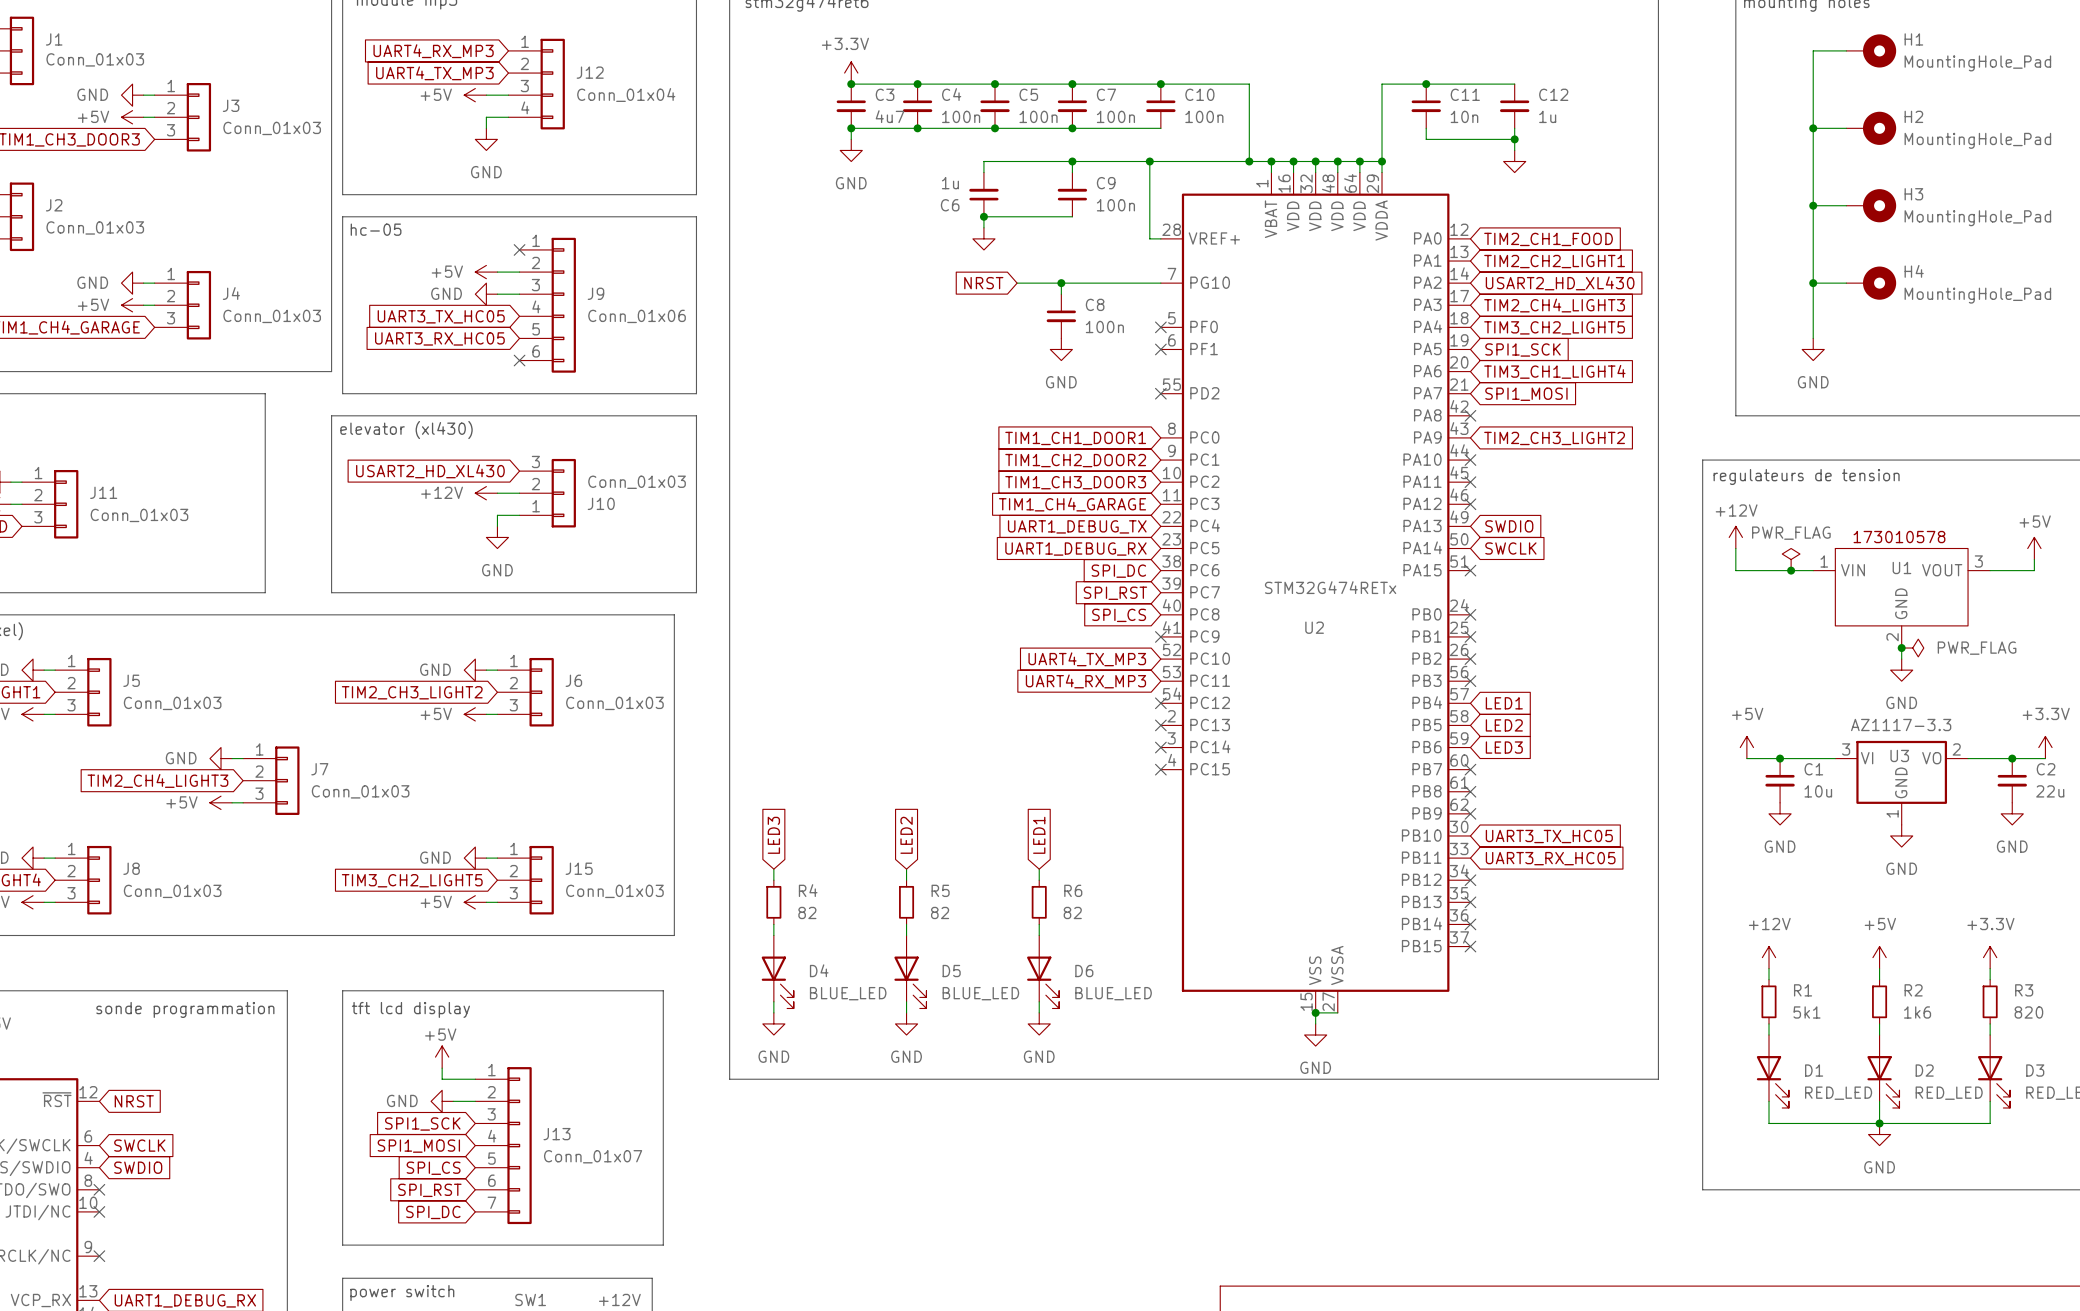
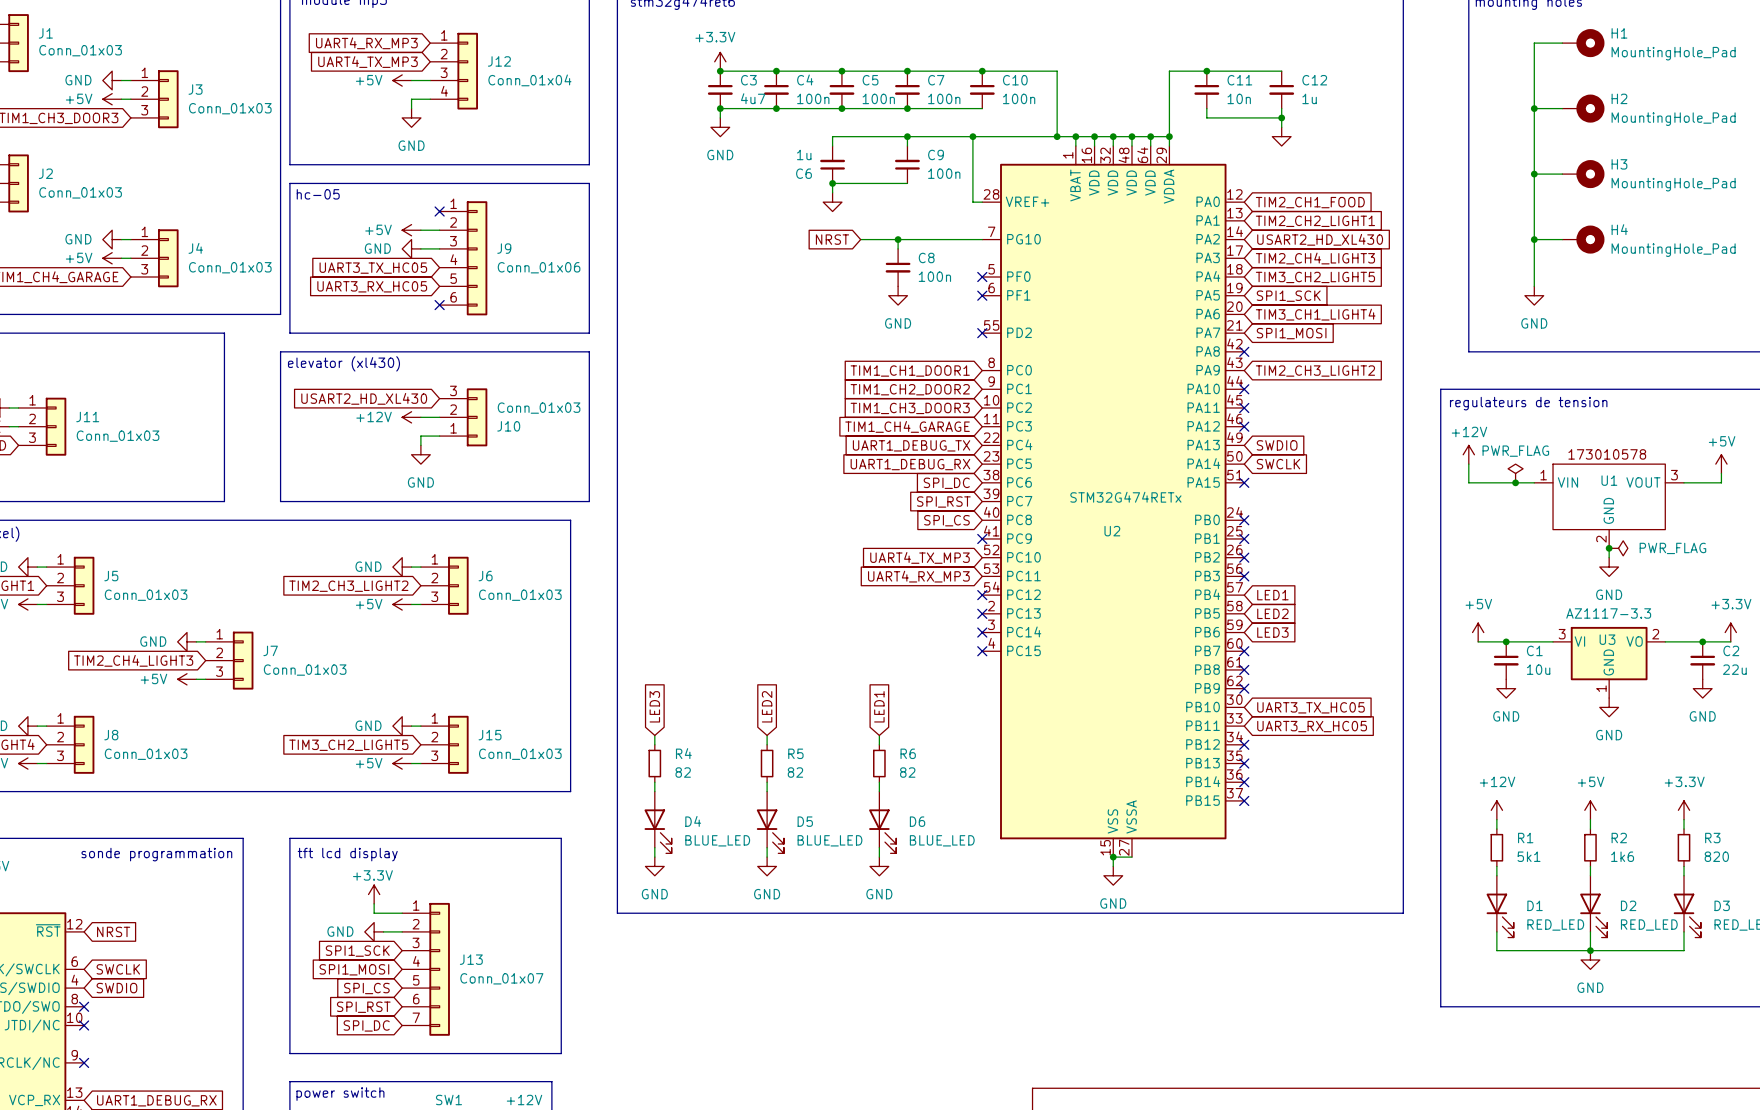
power symbol: +5V (442, 1057) -> +3.3V (374, 894)

